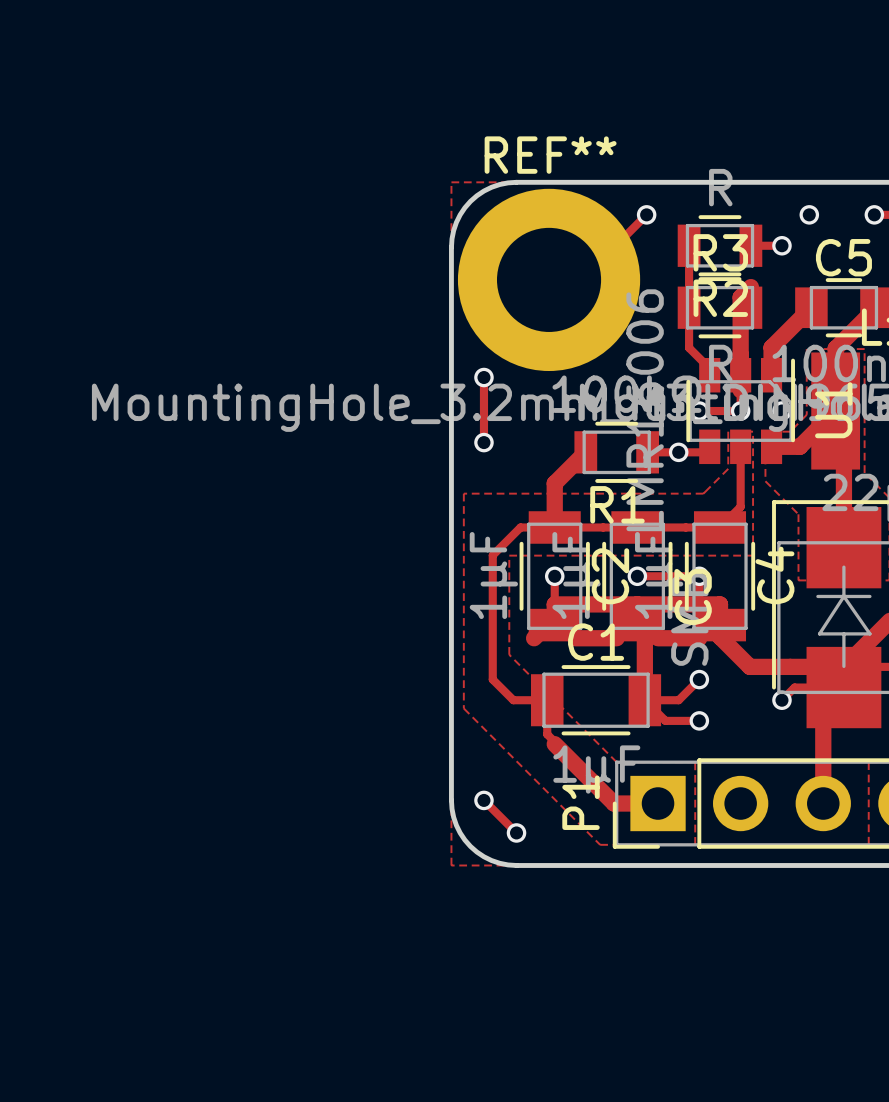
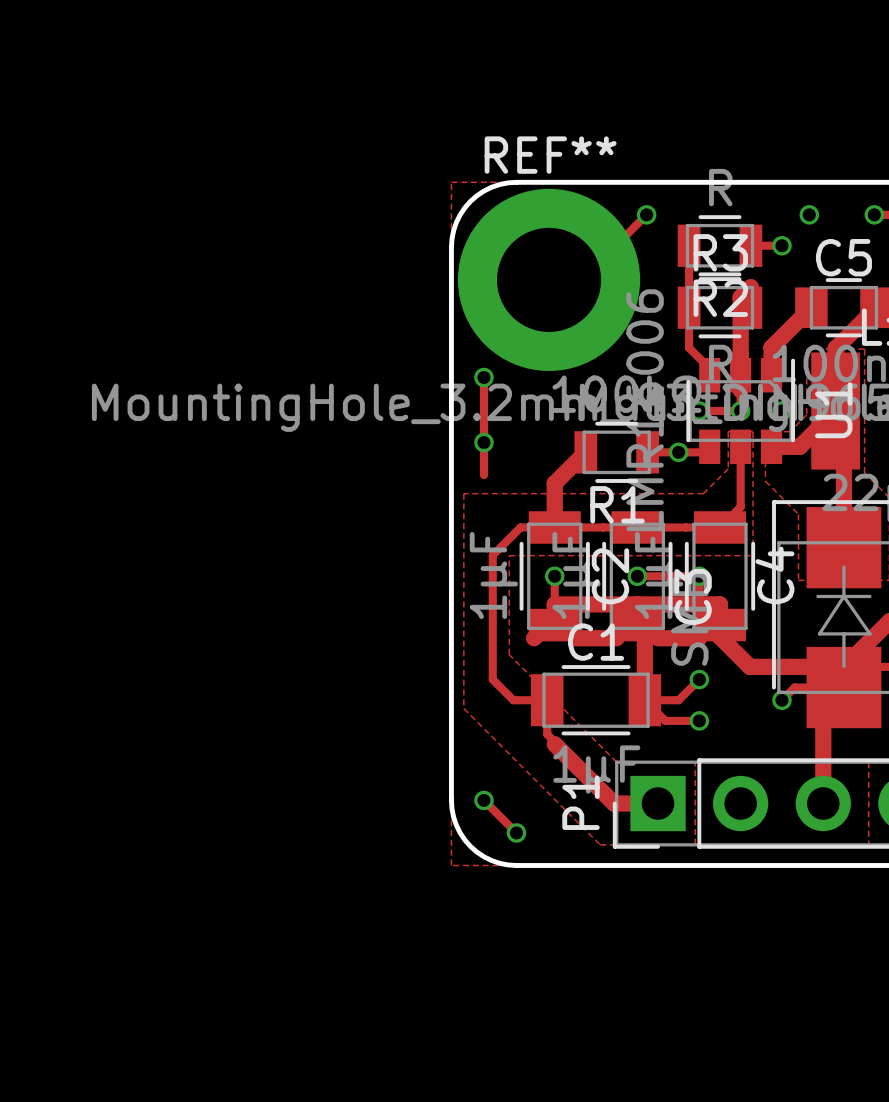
track: none -> (483, 442) (483, 475)

